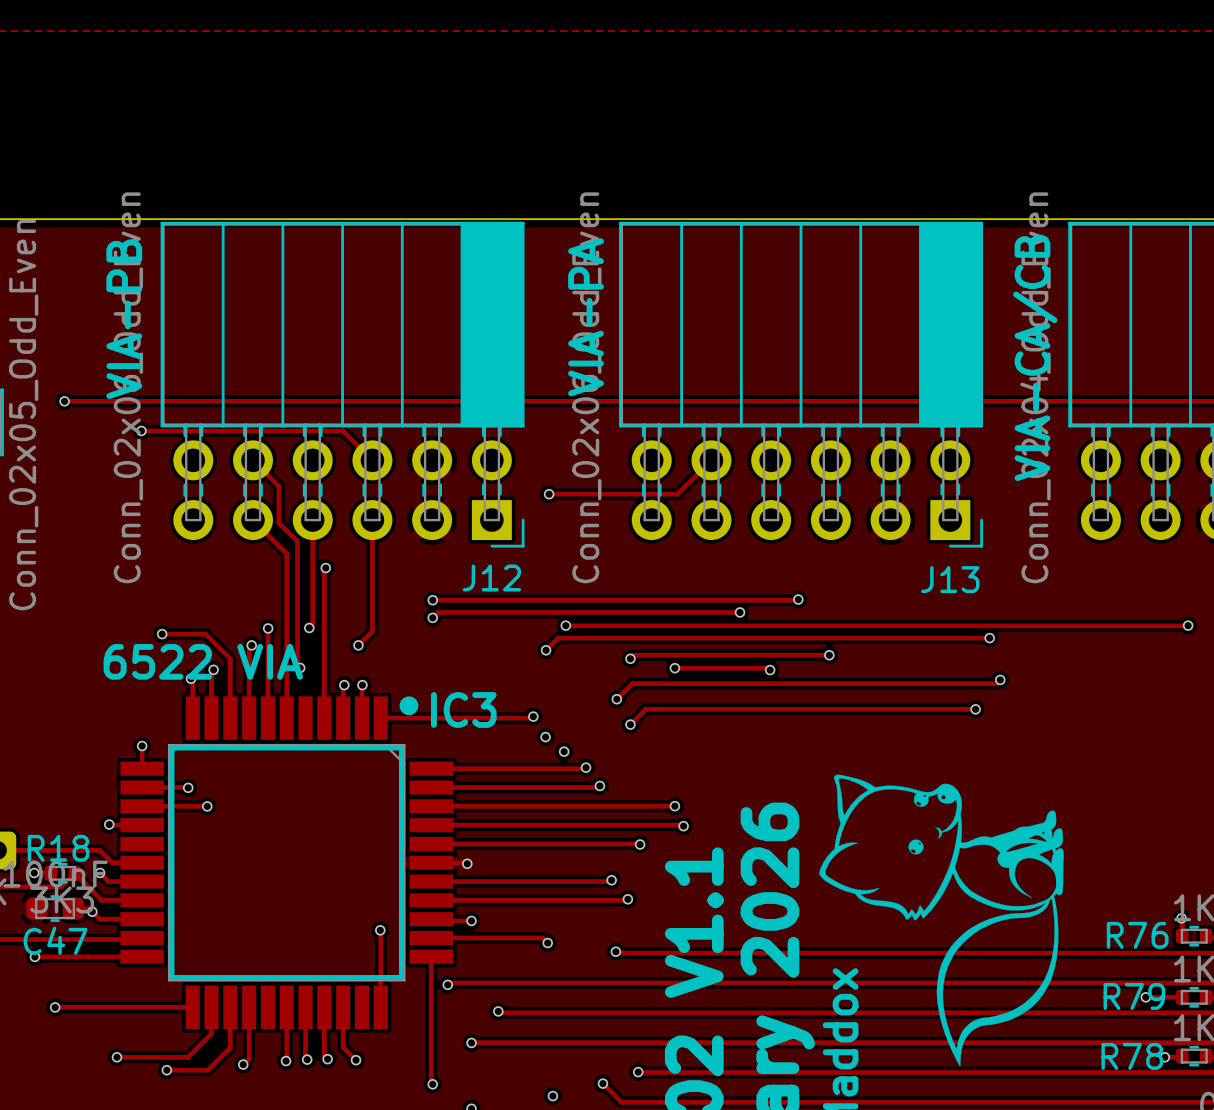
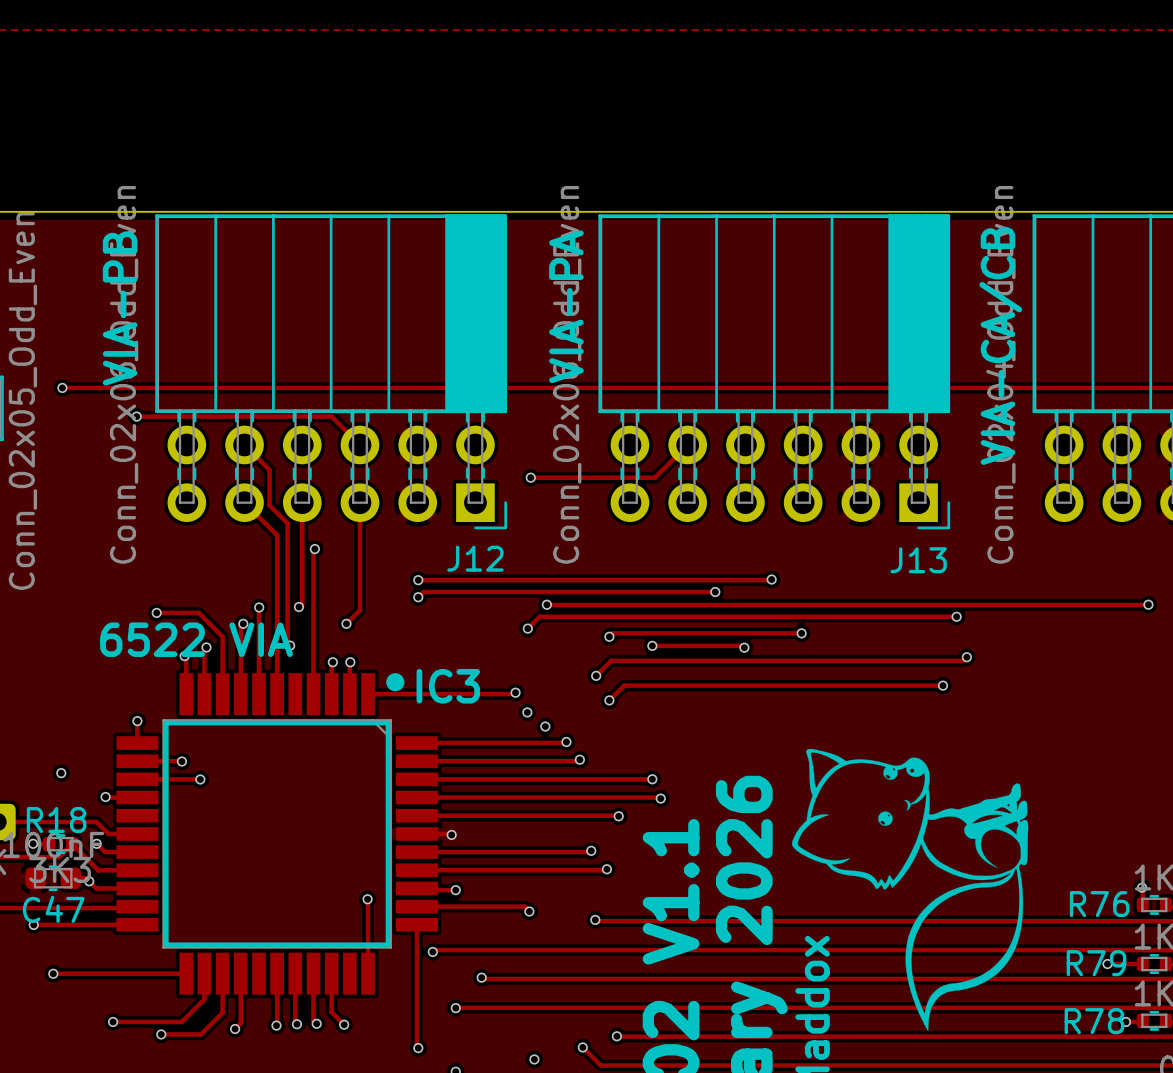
via: none -> (61, 773)

